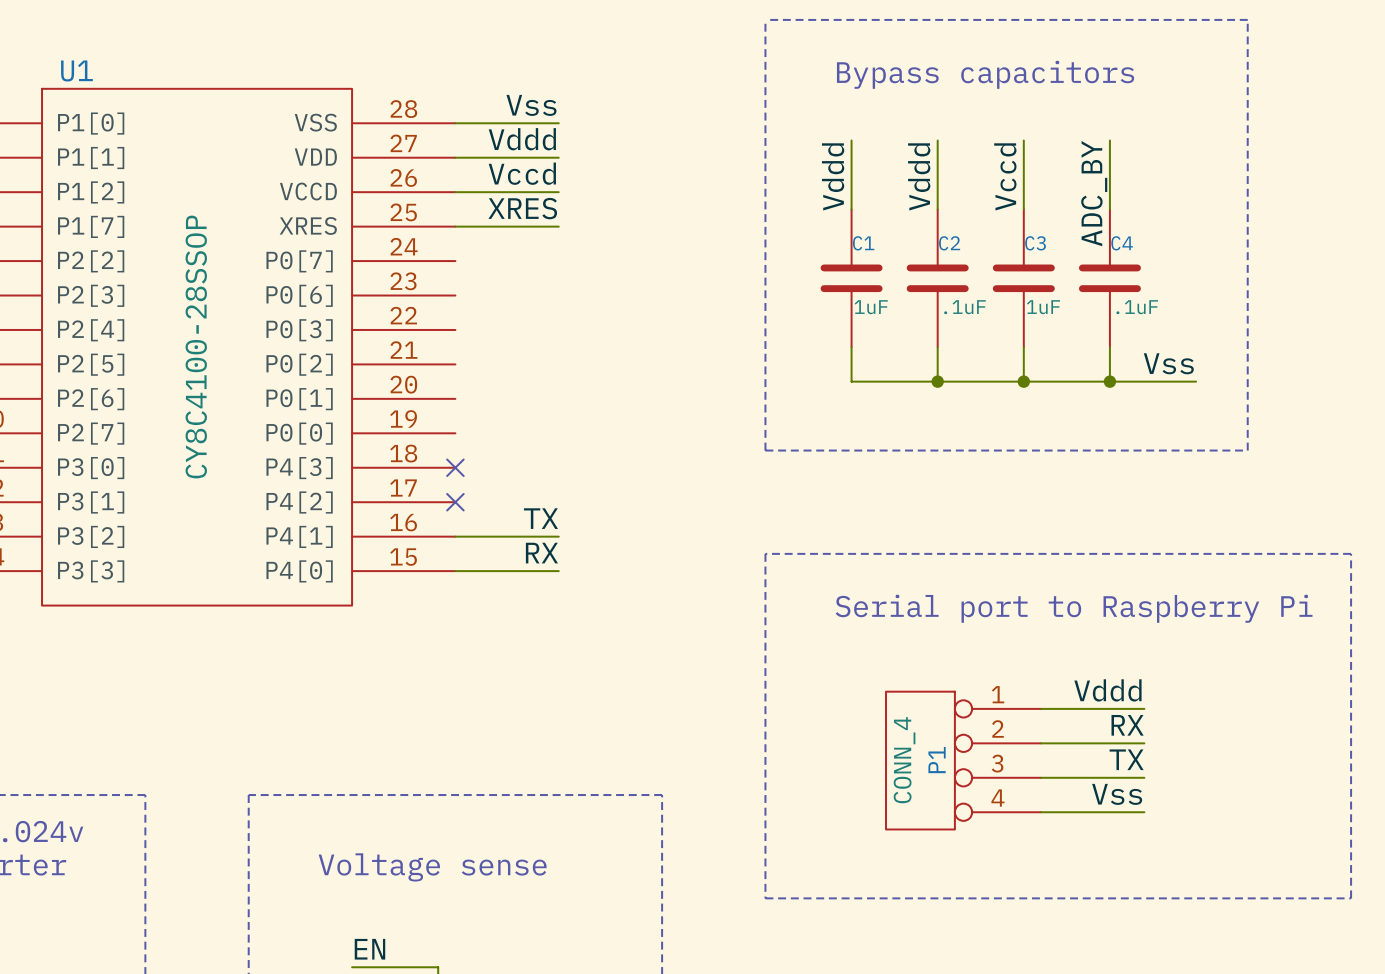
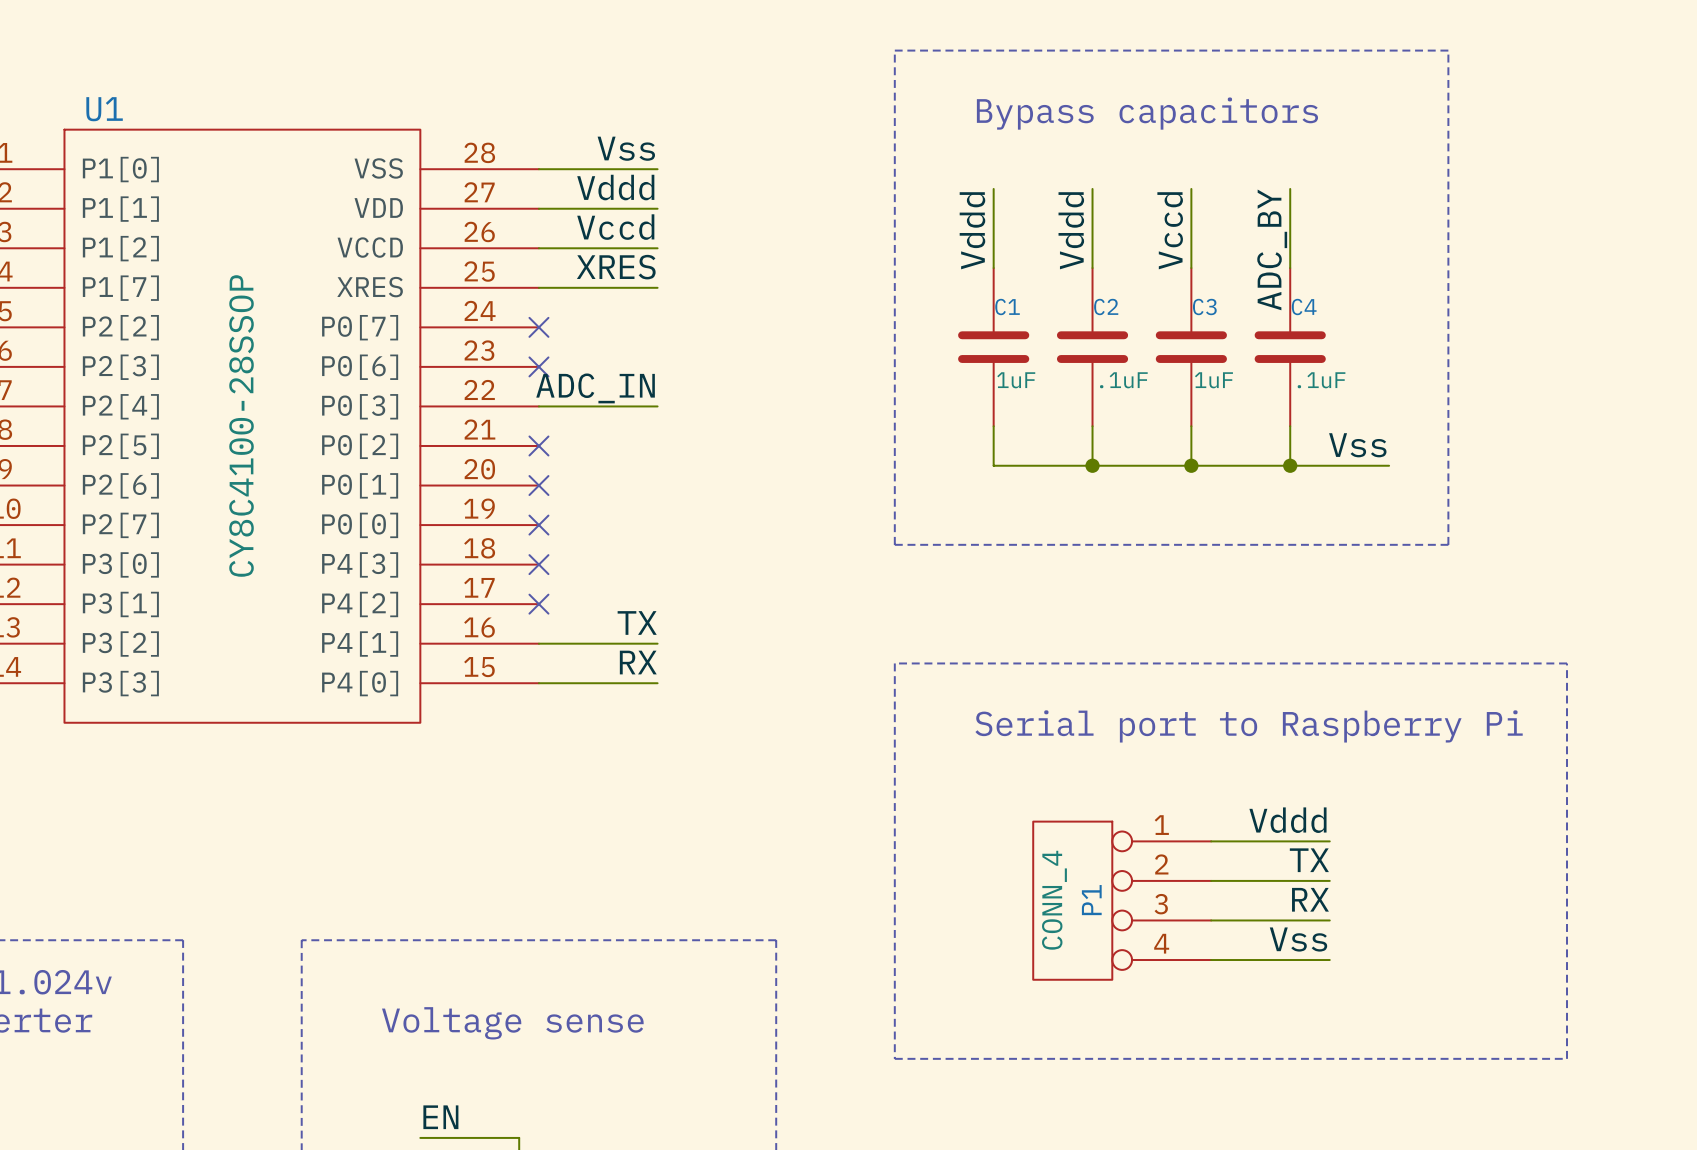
no-connect mark: none -> (538, 327)
no-connect mark: none -> (538, 366)
label: none -> ADC_IN (595, 388)
wire: none -> (538, 406) (657, 406)
no-connect mark: none -> (538, 445)
no-connect mark: none -> (538, 485)
no-connect mark: none -> (538, 525)
label: RX (1127, 725) -> TX (1309, 860)
label: TX (1126, 759) -> RX (1310, 899)

